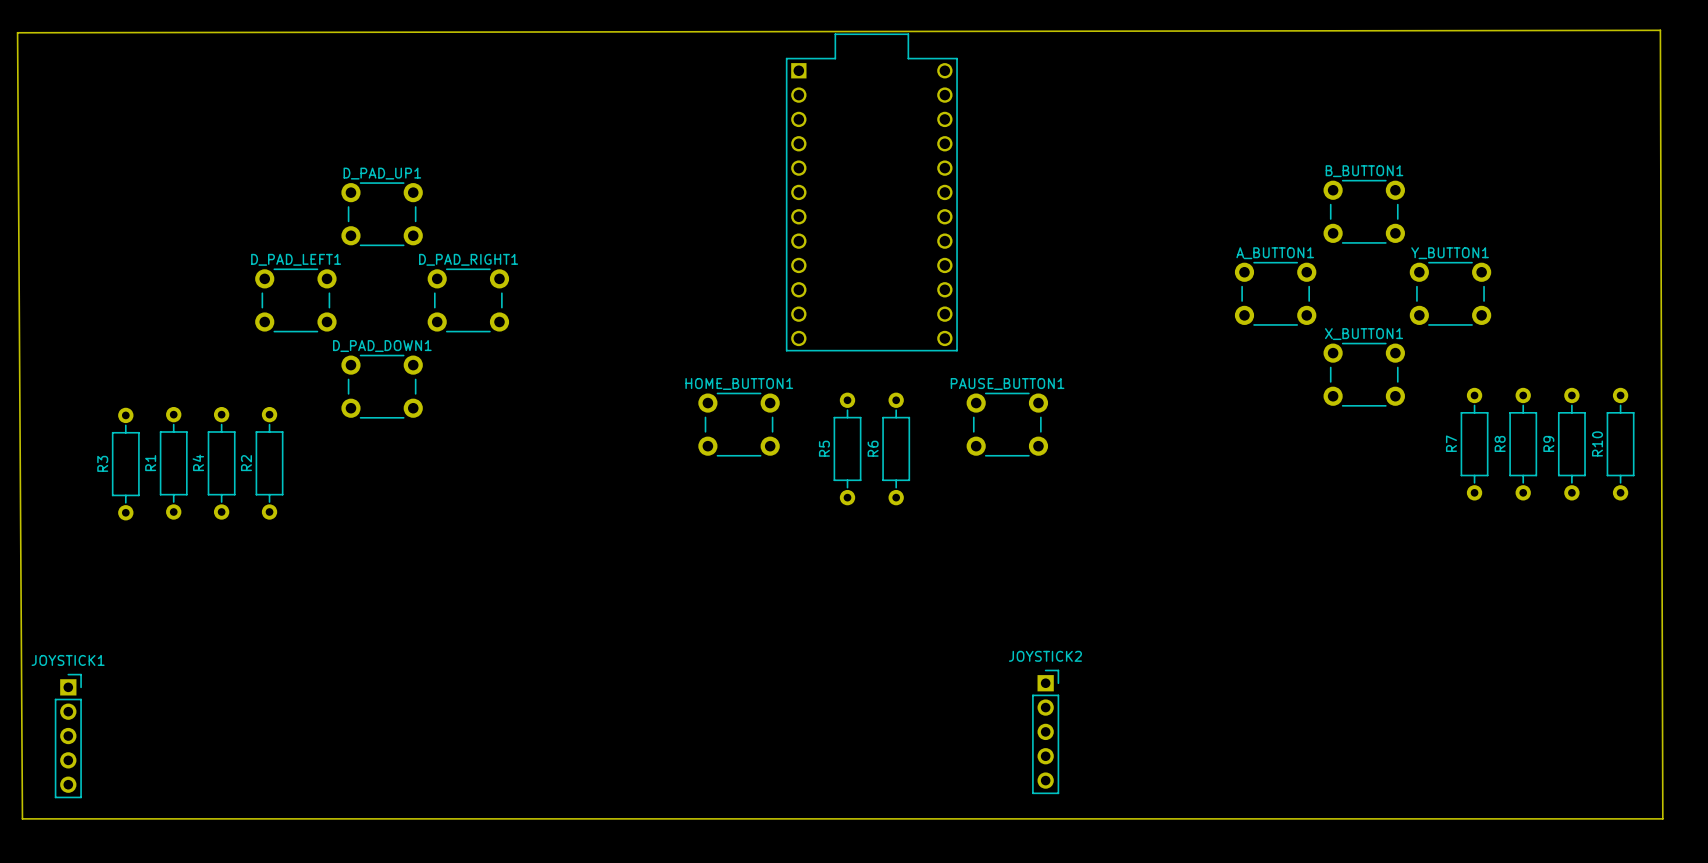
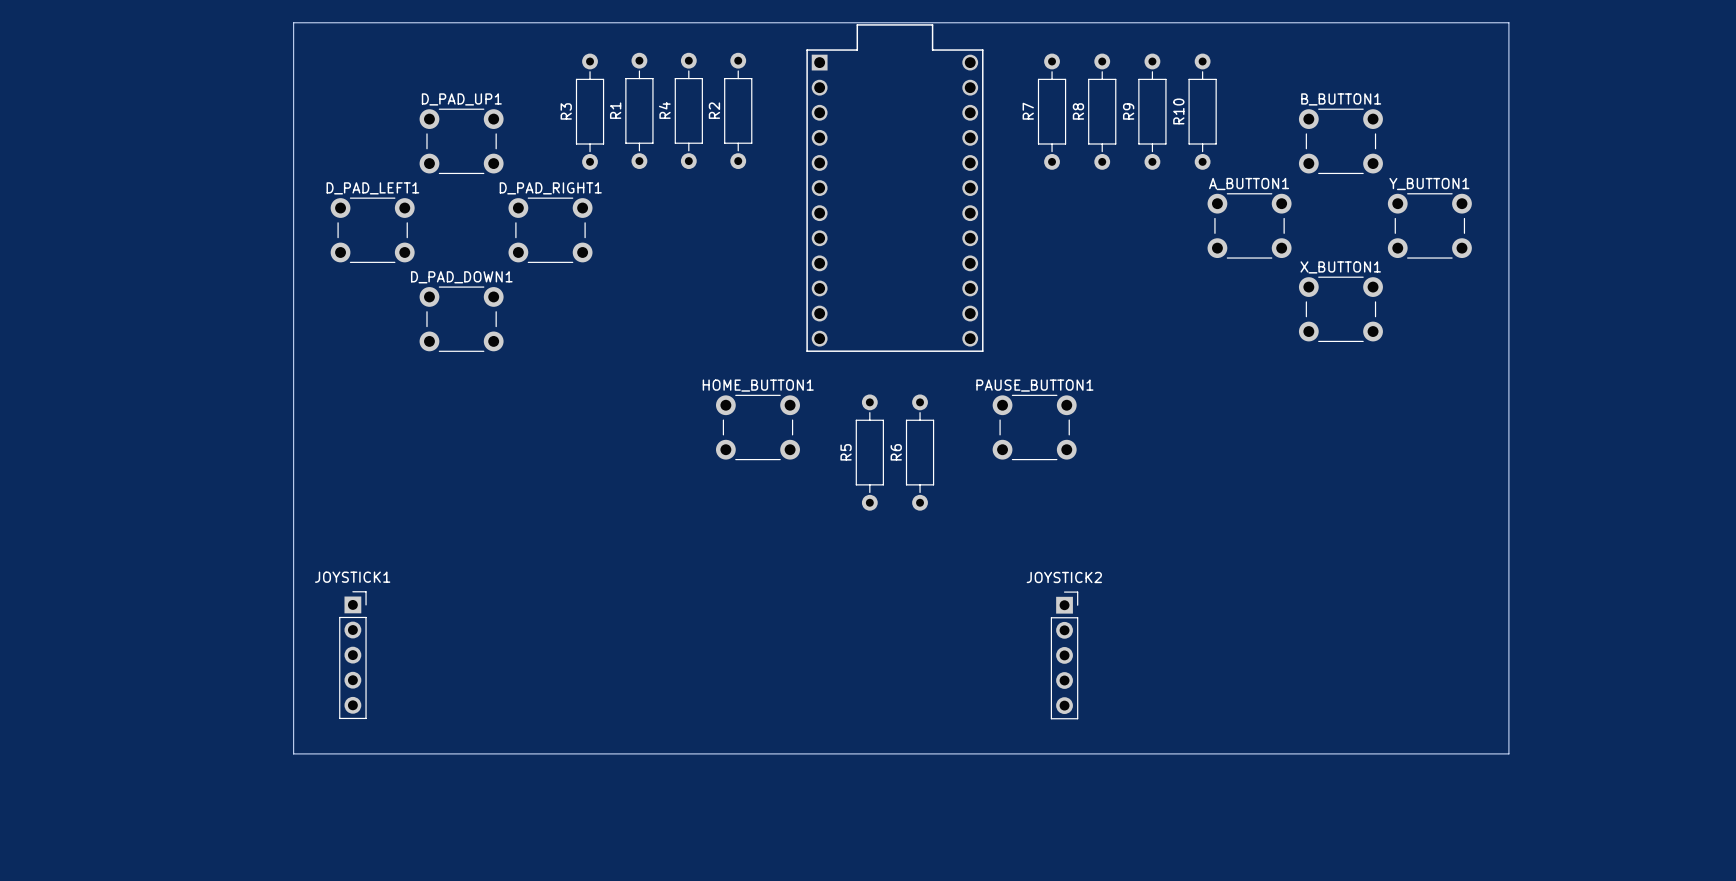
board edge: (1660, 30) (1662, 818) (22, 818) (17, 32) (1660, 30) -> (293, 22) (293, 753) (1508, 753) (1508, 22) (293, 22)
B_BUTTON1 position: (1364, 211) -> (1340, 141)
D_PAD_UP1 position: (382, 214) -> (461, 141)
A_BUTTON1 position: (1275, 293) -> (1249, 225)
Y_BUTTON1 position: (1450, 293) -> (1429, 225)
D_PAD_LEFT1 position: (295, 300) -> (372, 230)
D_PAD_RIGHT1 position: (468, 300) -> (550, 230)
X_BUTTON1 position: (1364, 374) -> (1340, 309)
D_PAD_DOWN1 position: (382, 386) -> (461, 319)
R7 position: (1474, 444) -> (1052, 111)
R8 position: (1523, 444) -> (1102, 111)
R9 position: (1571, 444) -> (1152, 111)
R10 position: (1620, 444) -> (1202, 111)
R1 position: (173, 463) -> (639, 110)
R4 position: (221, 463) -> (688, 110)
R2 position: (269, 463) -> (738, 110)
R3 position: (125, 464) -> (590, 111)
JOYSTICK2 position: (1045, 731) -> (1064, 655)
JOYSTICK1 position: (68, 736) -> (352, 655)

